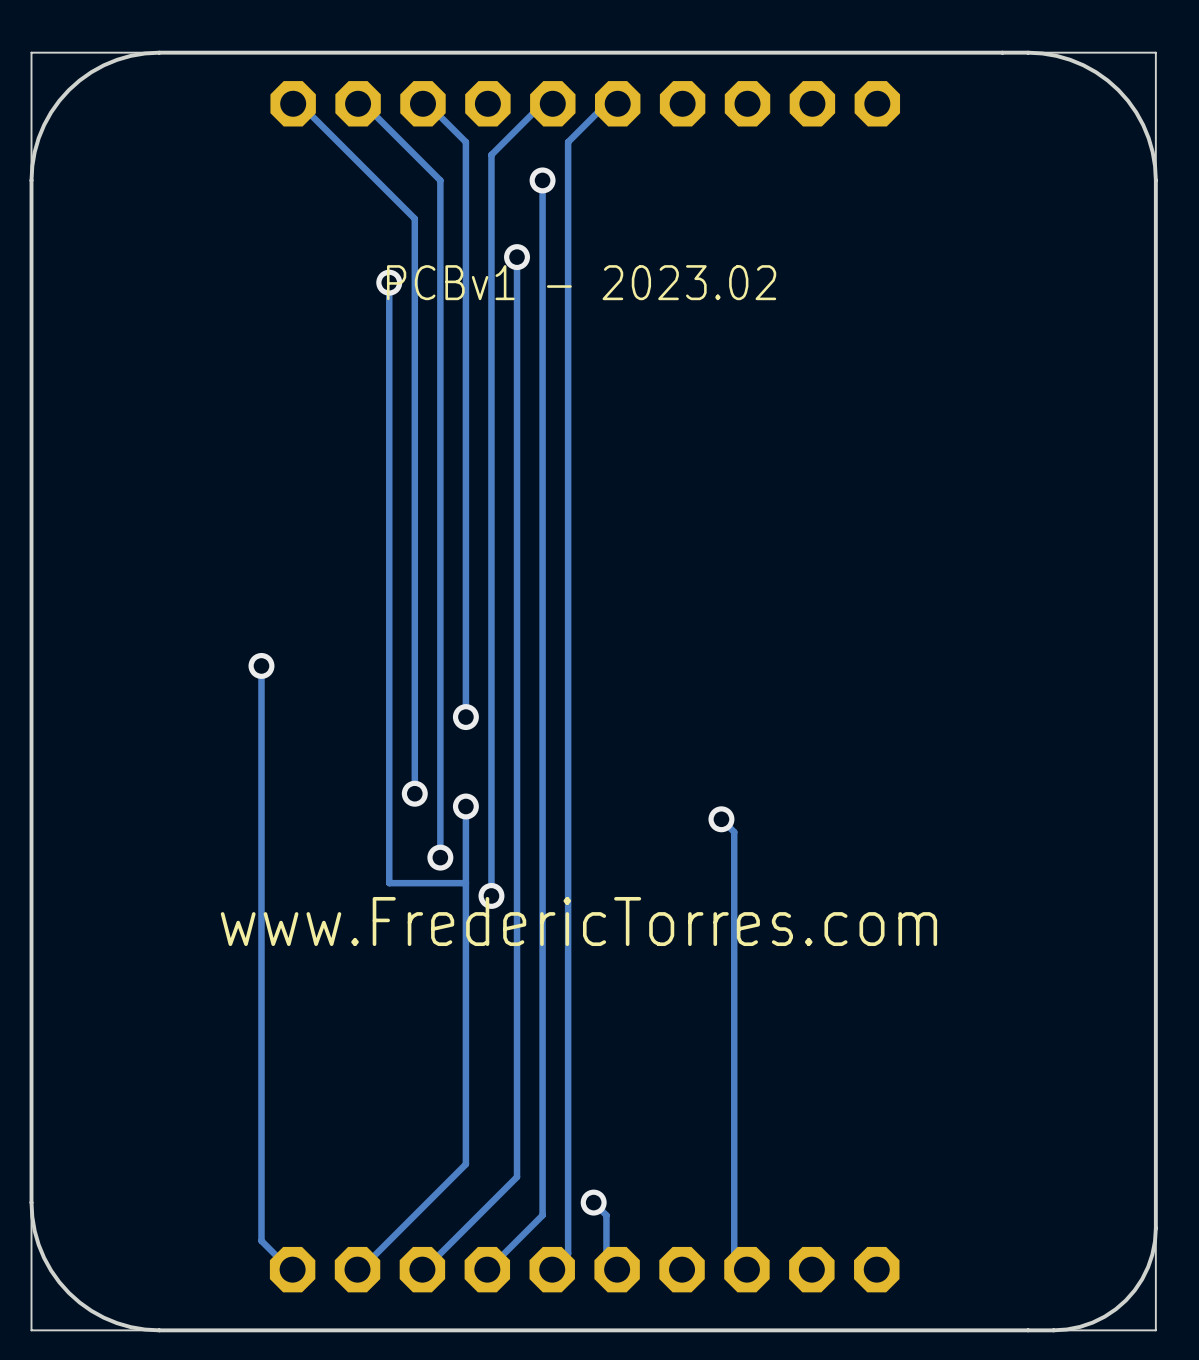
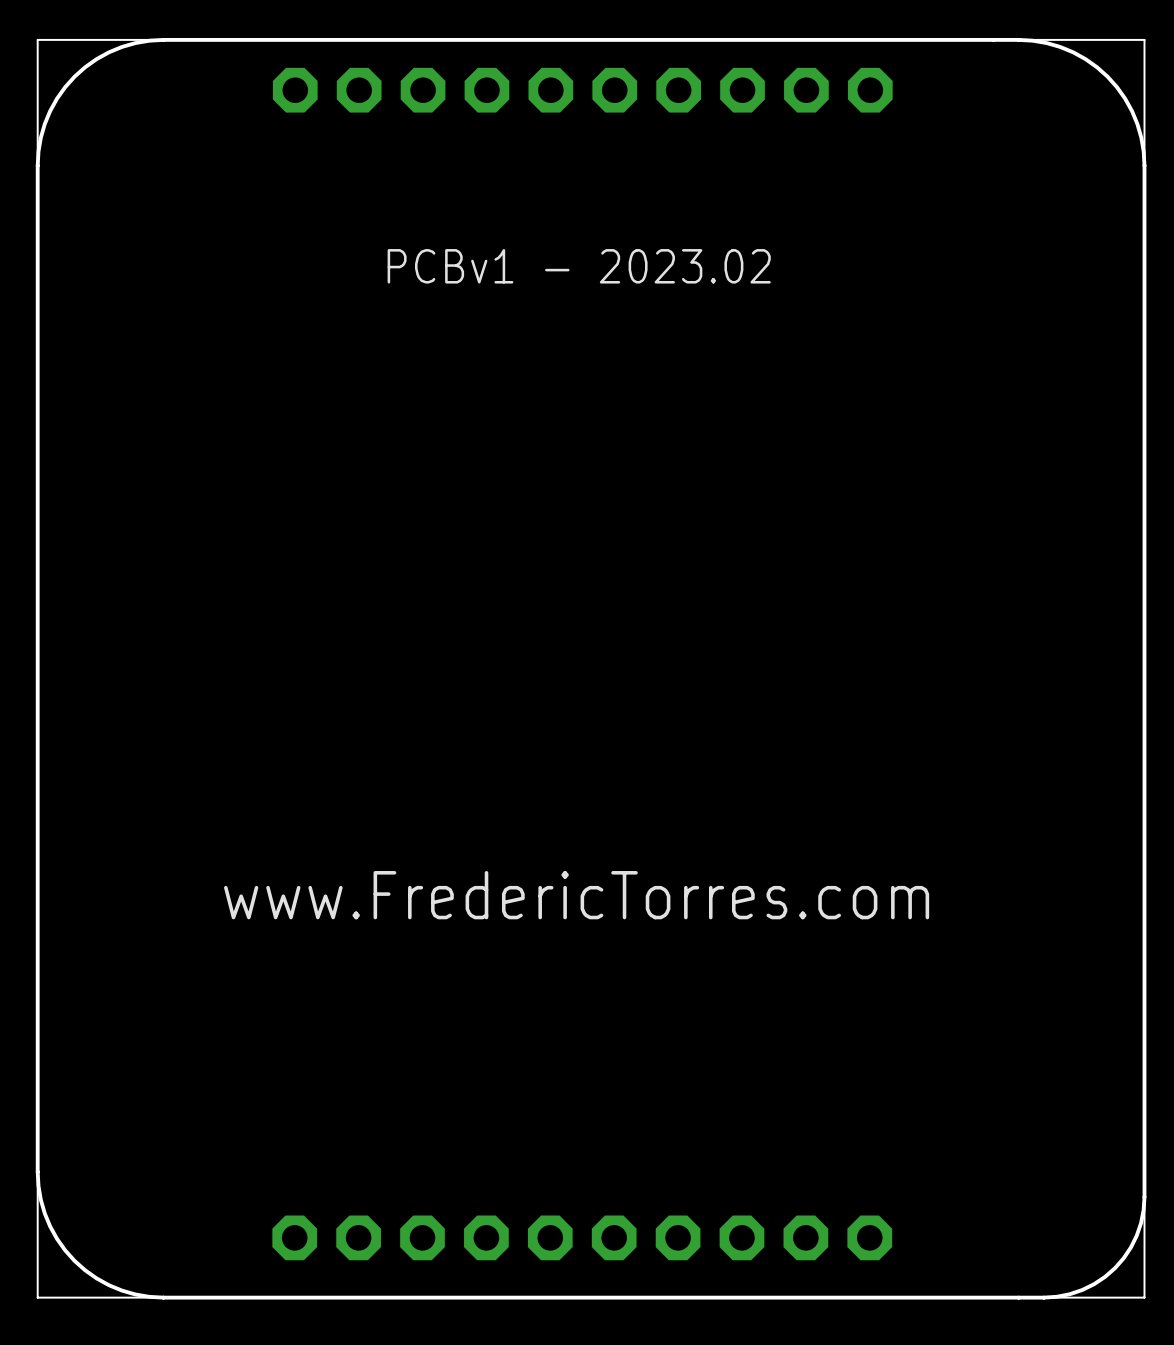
track: (293, 103) (299, 103) (414, 218) (414, 793) -> none
track: (358, 103) (363, 103) (440, 180) (440, 857) -> none
track: (422, 103) (427, 103) (465, 142) (465, 717) -> none
track: (552, 103) (542, 103) (491, 154) (491, 895) -> none
track: (617, 103) (606, 103) (568, 142) (568, 1253) (552, 1269) -> none
track: (542, 180) (542, 1215) (487, 1269) -> none
via: (542, 180) -> none
track: (517, 257) (517, 1177) (422, 1269) -> none
via: (517, 257) -> none
track: (389, 282) (389, 883) (465, 883) -> none
via: (389, 282) -> none
track: (261, 665) (261, 1240) (292, 1269) -> none
via: (261, 665) -> none
via: (465, 717) -> none
via: (414, 793) -> none
track: (465, 806) (465, 1164) (363, 1266) (357, 1269) -> none
via: (465, 806) -> none
track: (721, 819) (734, 832) (734, 1266) (746, 1269) -> none
via: (721, 819) -> none
via: (440, 857) -> none
via: (491, 895) -> none
track: (593, 1202) (606, 1215) (606, 1266) (617, 1269) -> none
via: (593, 1202) -> none

